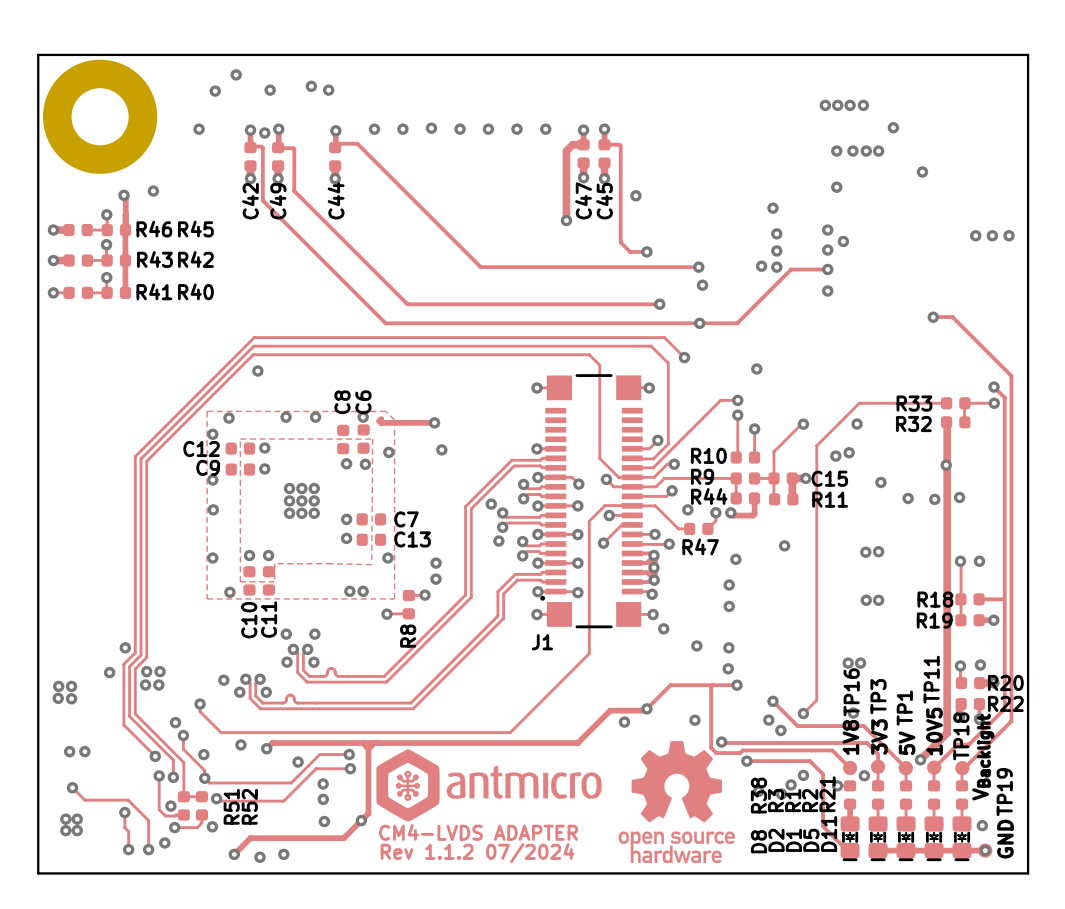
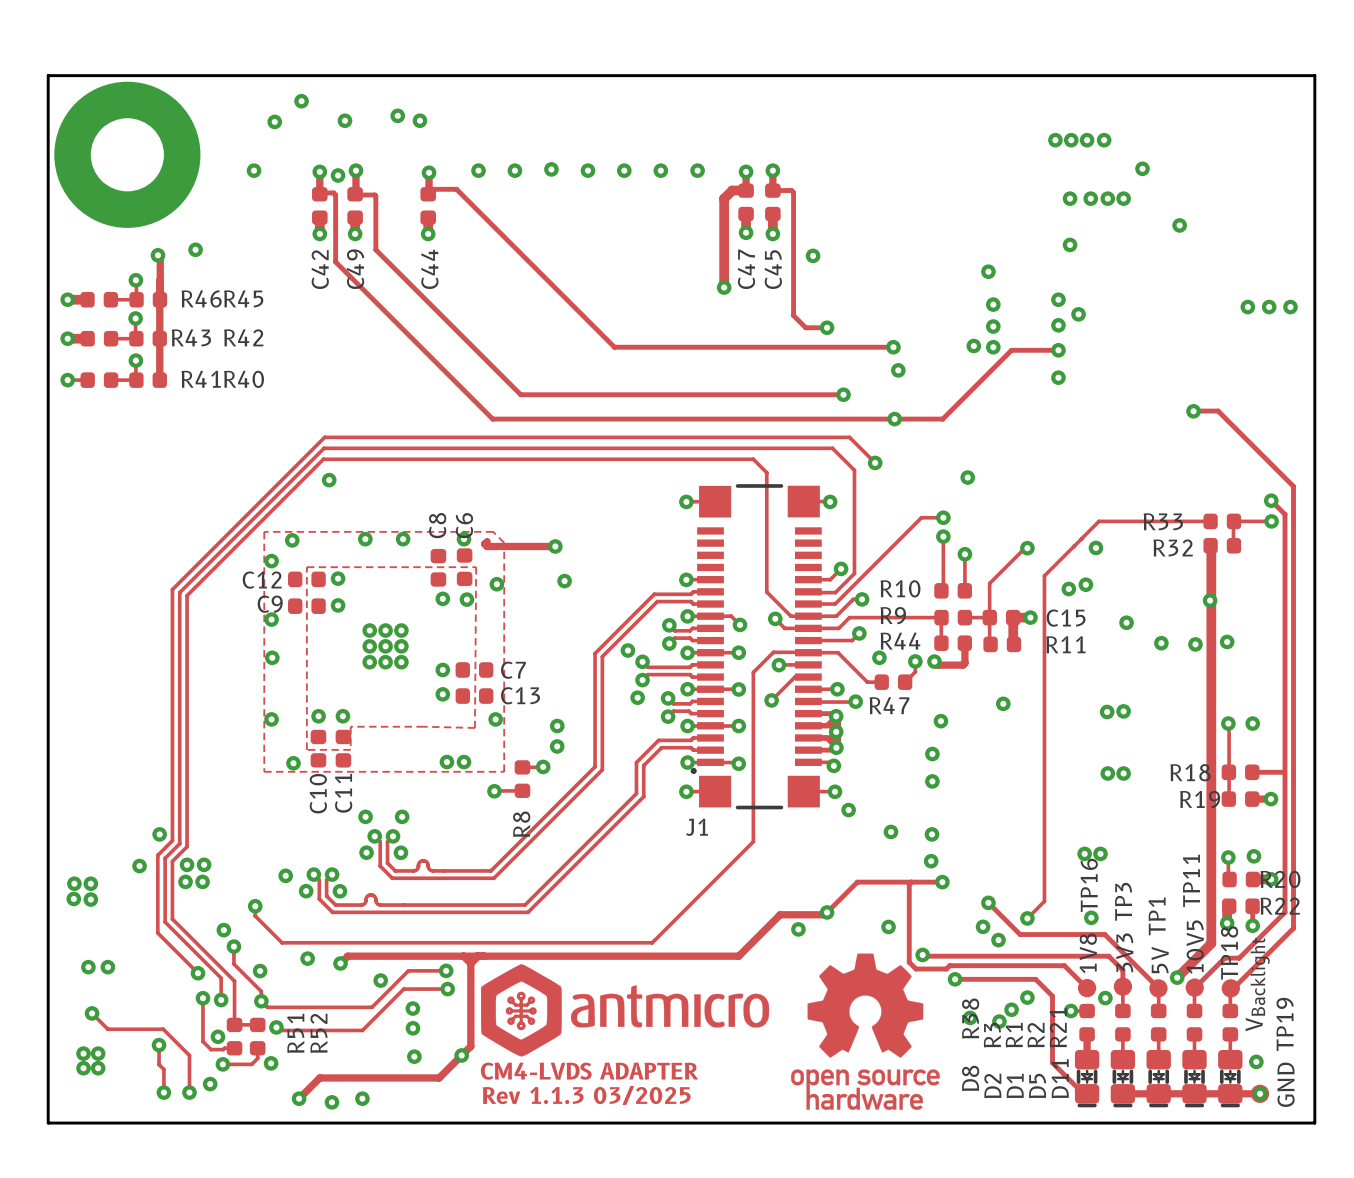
text: Rev 1.1.2 07/2024 (477, 853) -> Rev 1.1.3 03/2025 (586, 1095)

